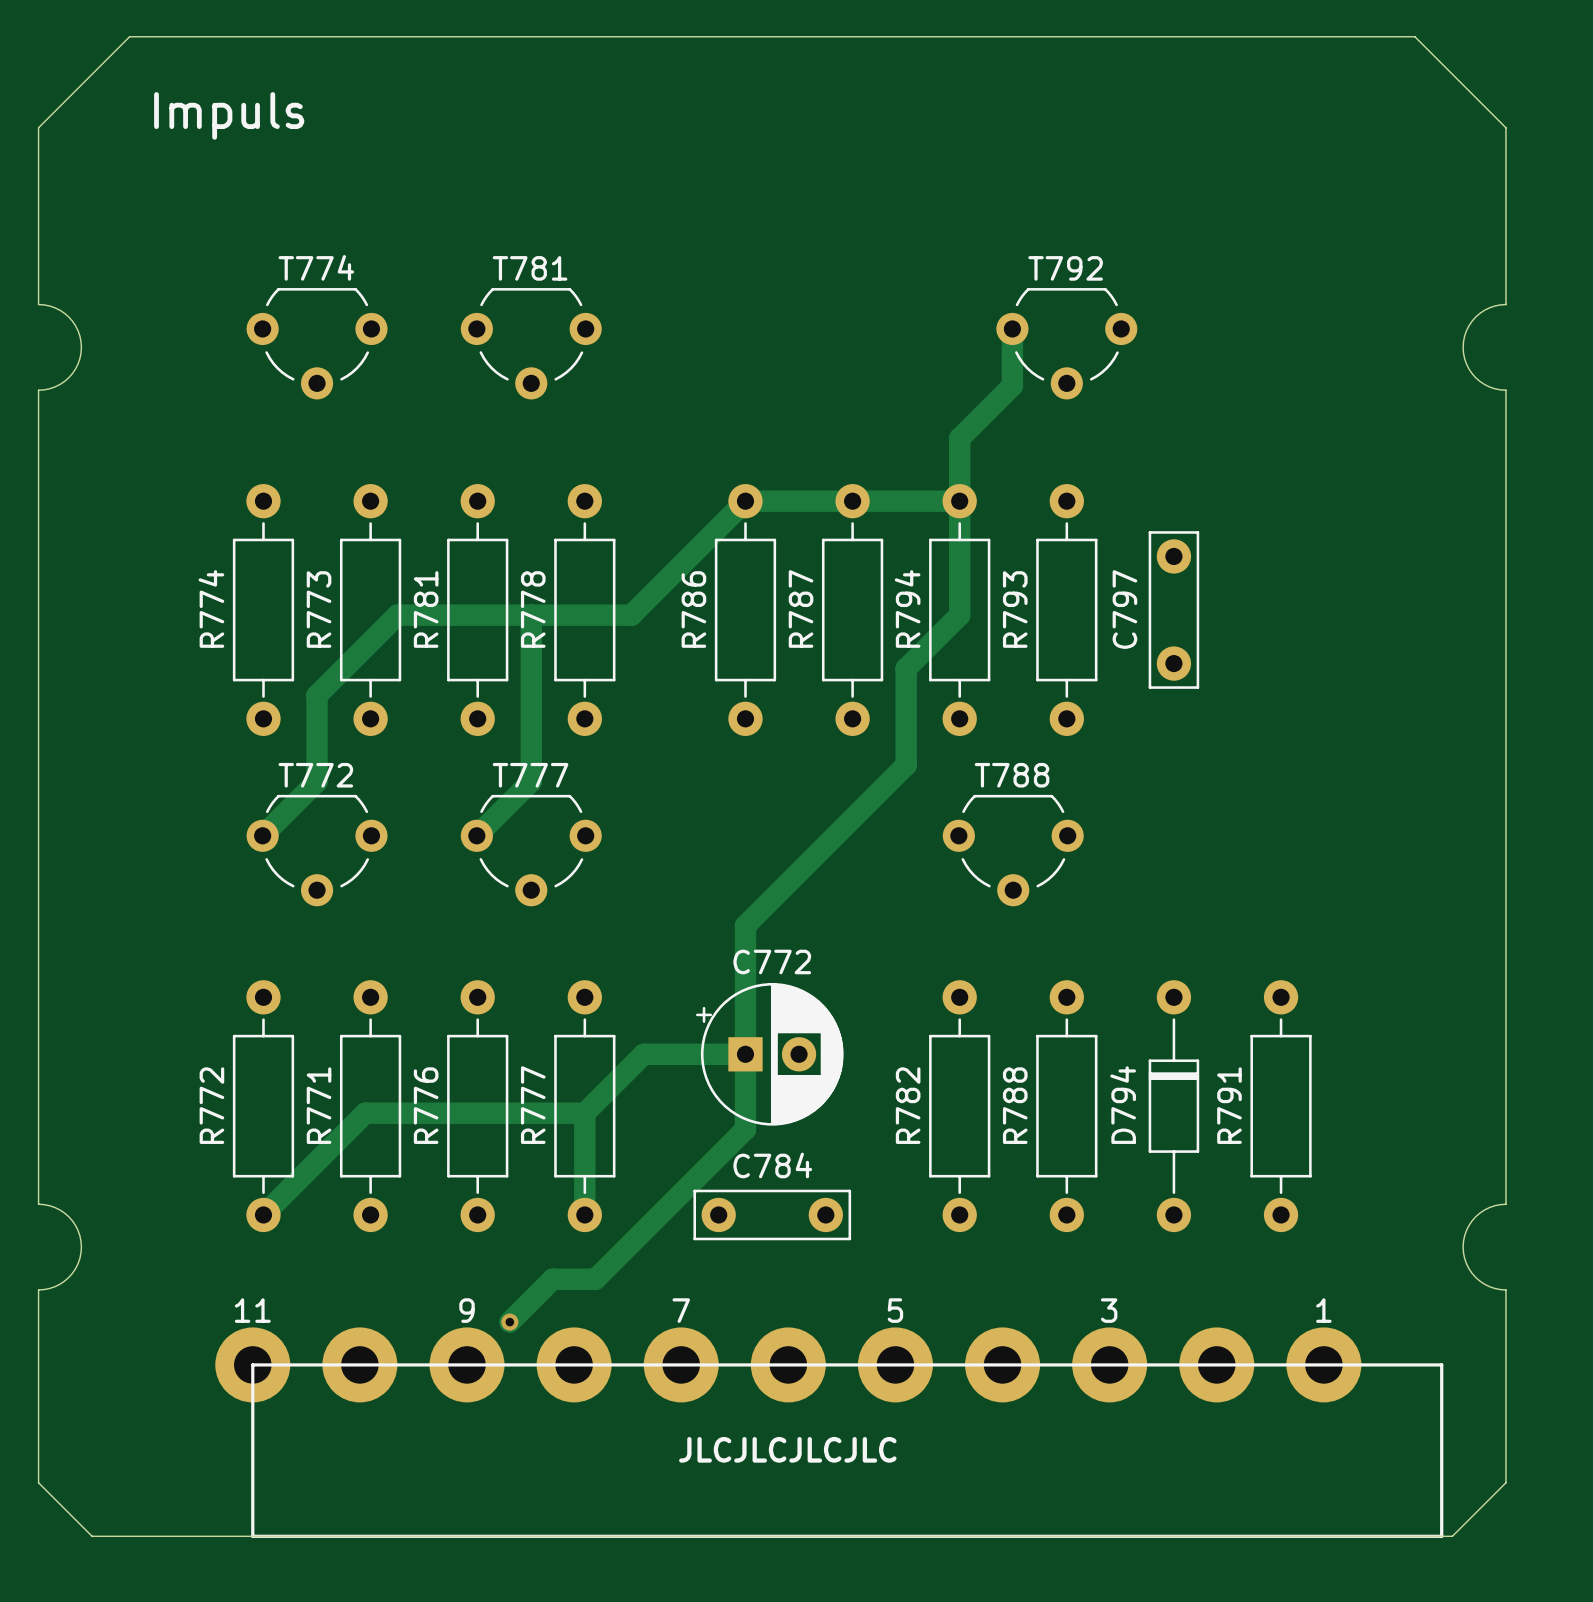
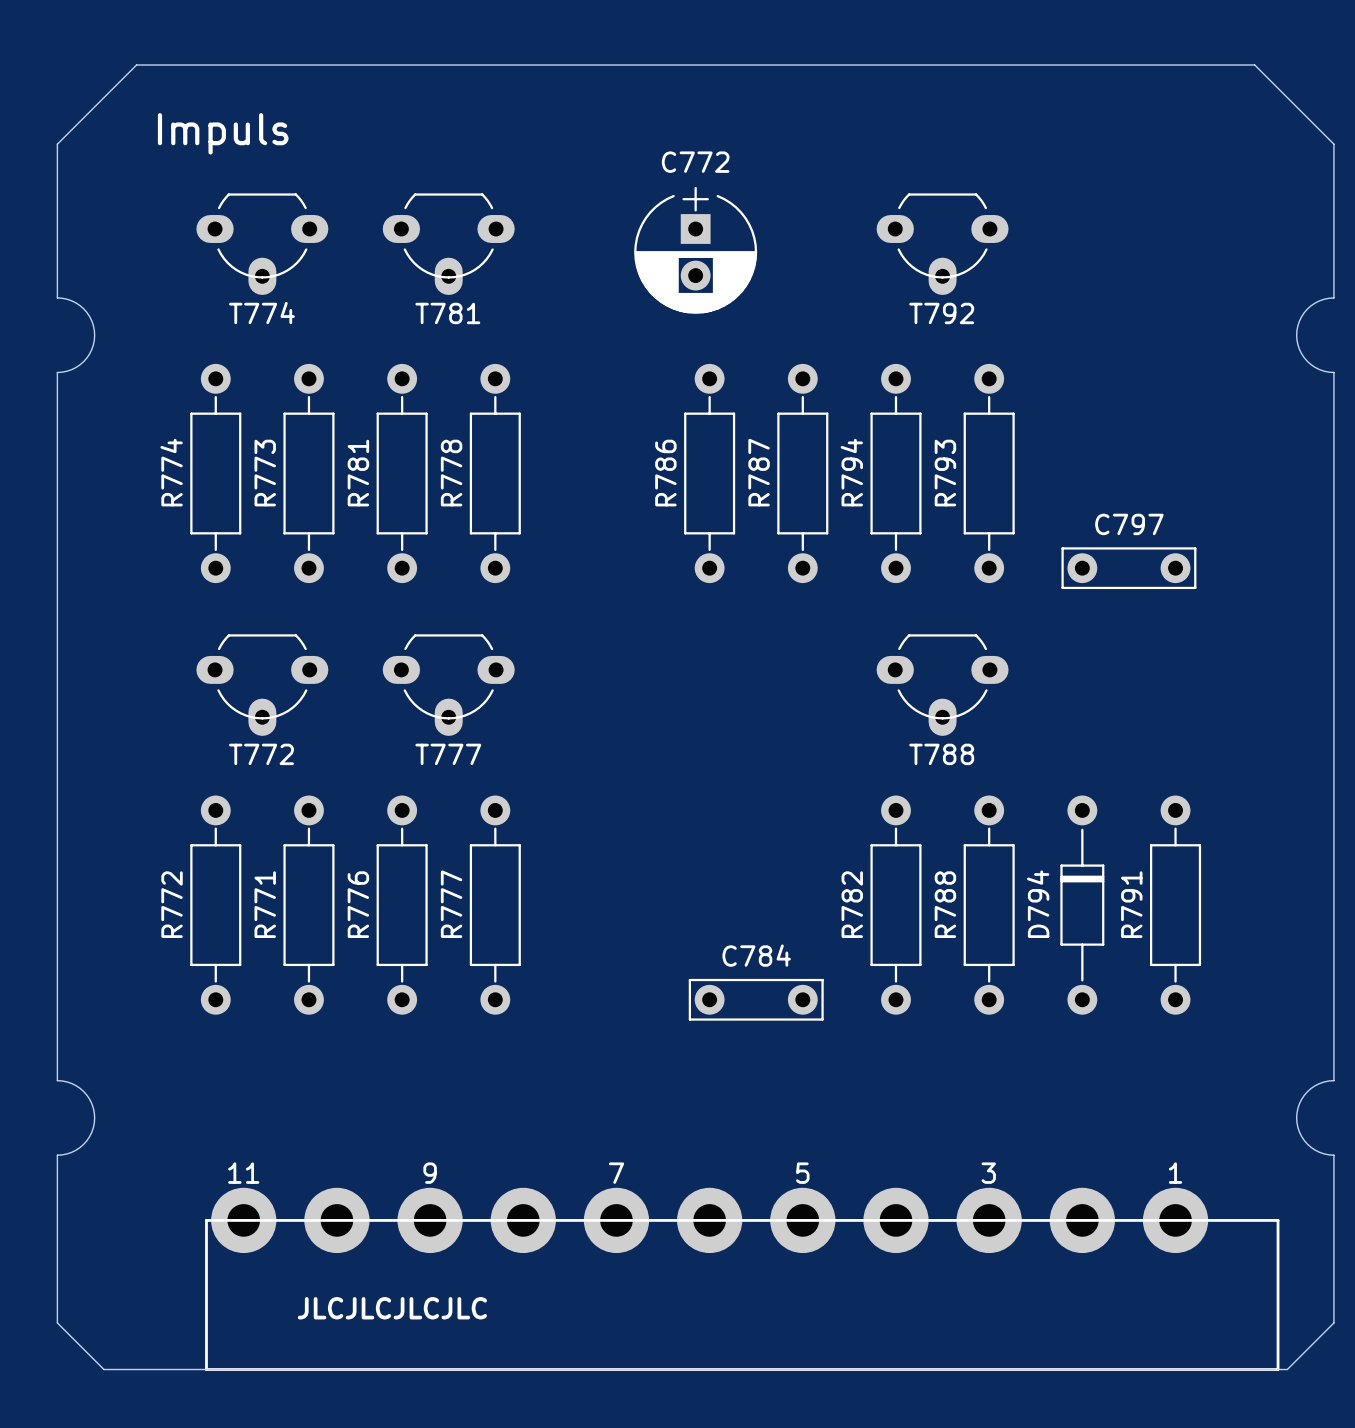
T774 name position: T774 (316, 267) -> T774 (261, 313)
T781 name position: T781 (530, 268) -> T781 (447, 313)
T792 name position: T792 (1065, 268) -> T792 (941, 313)
T774 footprint: [246, 288, 388, 400] -> [196, 193, 329, 295]
T781 footprint: [460, 288, 602, 400] -> [382, 193, 515, 295]
T792 footprint: [996, 288, 1138, 400] -> [876, 193, 1009, 295]
track: (1012, 328) (1012, 385) (959, 438) (959, 615) (906, 668) (906, 765) (745, 925) (745, 1129) (595, 1279) (552, 1279) (509, 1322) -> none
R774 footprint: [232, 484, 295, 736] -> [190, 363, 242, 584]
R773 footprint: [339, 484, 402, 736] -> [283, 363, 335, 584]
R781 footprint: [447, 484, 509, 736] -> [376, 363, 428, 584]
R778 footprint: [554, 484, 616, 736] -> [469, 363, 521, 584]
R786 footprint: [714, 484, 777, 736] -> [684, 363, 736, 584]
R787 footprint: [821, 484, 884, 736] -> [777, 363, 829, 584]
R794 footprint: [929, 484, 991, 736] -> [870, 363, 922, 584]
R793 footprint: [1036, 484, 1098, 736] -> [963, 363, 1015, 584]
track: (959, 501) (745, 501) (631, 615) (397, 615) (317, 695) (317, 781) (262, 835) -> none
C797 footprint: [1148, 531, 1200, 689] -> [1061, 547, 1197, 590]
C797 name position: C797 (1124, 609) -> C797 (1129, 524)
track: (531, 615) (531, 781) (476, 835) -> none
T772 name position: T772 (315, 775) -> T772 (261, 754)
T777 name position: T777 (530, 775) -> T777 (448, 754)
T788 name position: T788 (1012, 775) -> T788 (941, 754)
T772 footprint: [246, 794, 388, 907] -> [196, 634, 329, 736]
T777 footprint: [460, 794, 602, 907] -> [382, 634, 515, 736]
T788 footprint: [942, 794, 1084, 907] -> [876, 634, 1009, 736]
R772 footprint: [232, 980, 295, 1233] -> [190, 795, 242, 1015]
R771 footprint: [339, 980, 402, 1233] -> [283, 795, 335, 1015]
R776 footprint: [447, 980, 509, 1233] -> [376, 795, 428, 1015]
R777 footprint: [554, 980, 616, 1233] -> [469, 795, 521, 1015]
R782 footprint: [929, 980, 991, 1233] -> [870, 795, 922, 1015]
R788 footprint: [1036, 980, 1098, 1233] -> [963, 795, 1015, 1015]
R791 footprint: [1250, 980, 1312, 1233] -> [1150, 795, 1202, 1015]
C772 footprint: [696, 982, 844, 1126] -> [634, 186, 758, 314]
track: (745, 1054) (643, 1054) (584, 1113) -> none
D794 position: (1173, 1106) -> (1082, 905)
track: (584, 1113) (365, 1113) (263, 1214) -> none
track: (584, 1113) (584, 1214) -> none
C784 footprint: [693, 1189, 852, 1241] -> [688, 978, 824, 1021]
via: (509, 1322) -> none
part footprint: [215, 1327, 1444, 1538] -> [205, 1187, 1280, 1371]
text position: JLCJLCJLCJLC (787, 1449) -> JLCJLCJLCJLC (392, 1308)

